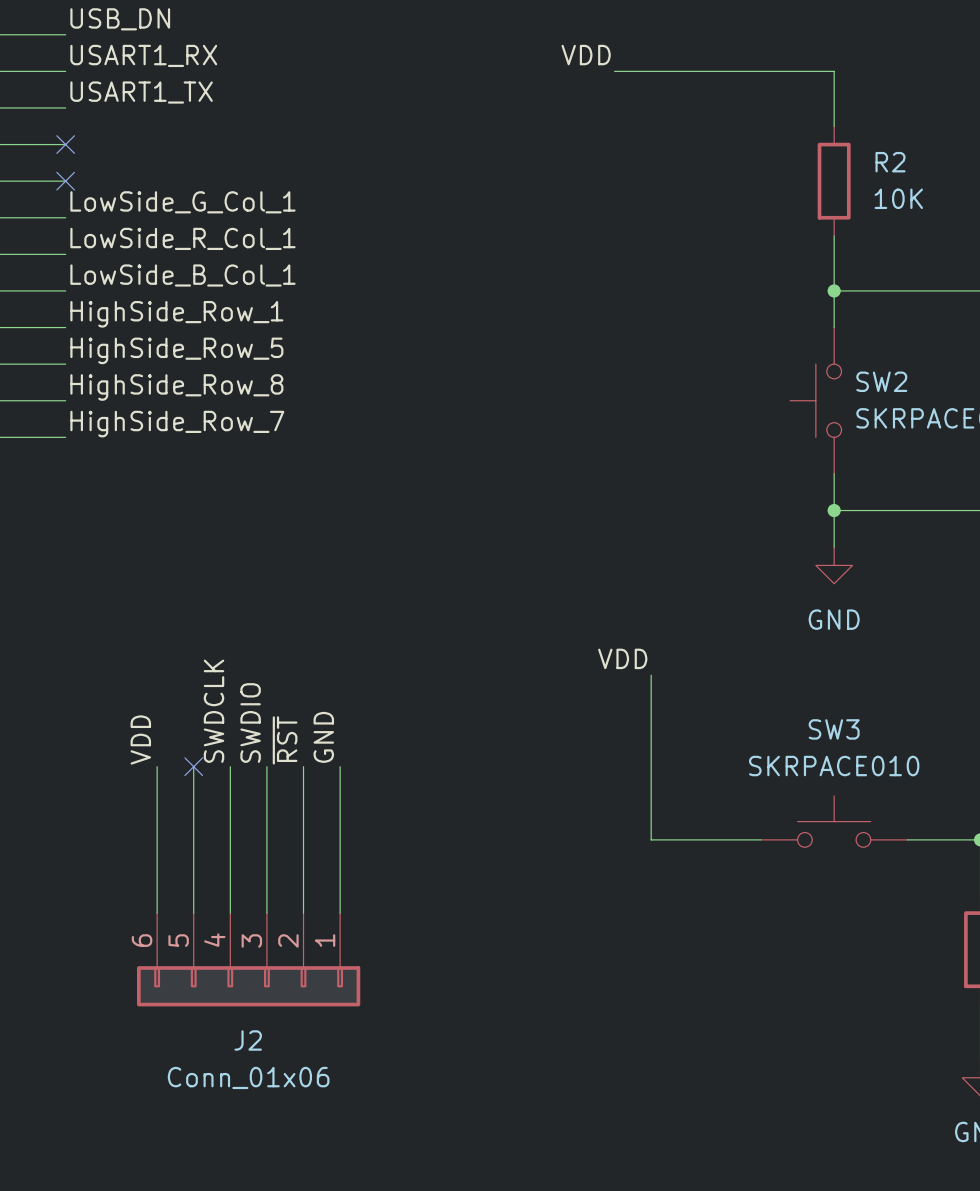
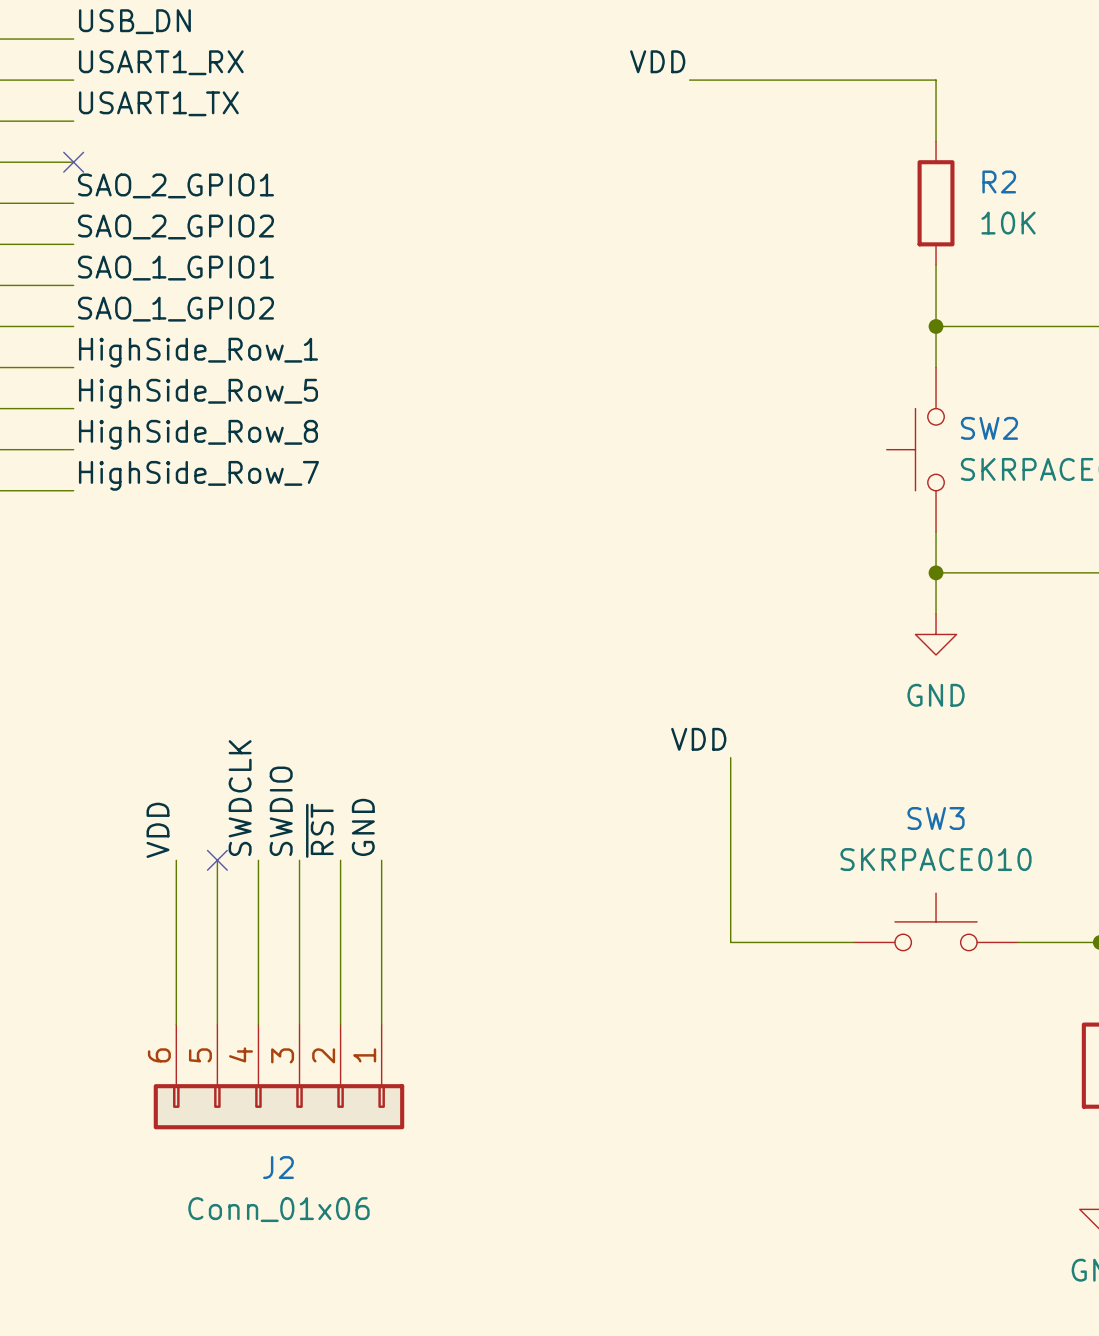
label: none -> SAO_2_GPIO1 (175, 185)
no-connect mark: (65, 181) -> none
label: LowSide_G_Col_1 (182, 202) -> SAO_2_GPIO2 (175, 227)
label: LowSide_R_Col_1 (182, 238) -> SAO_1_GPIO1 (175, 268)
label: LowSide_B_Col_1 (182, 275) -> SAO_1_GPIO2 (175, 309)

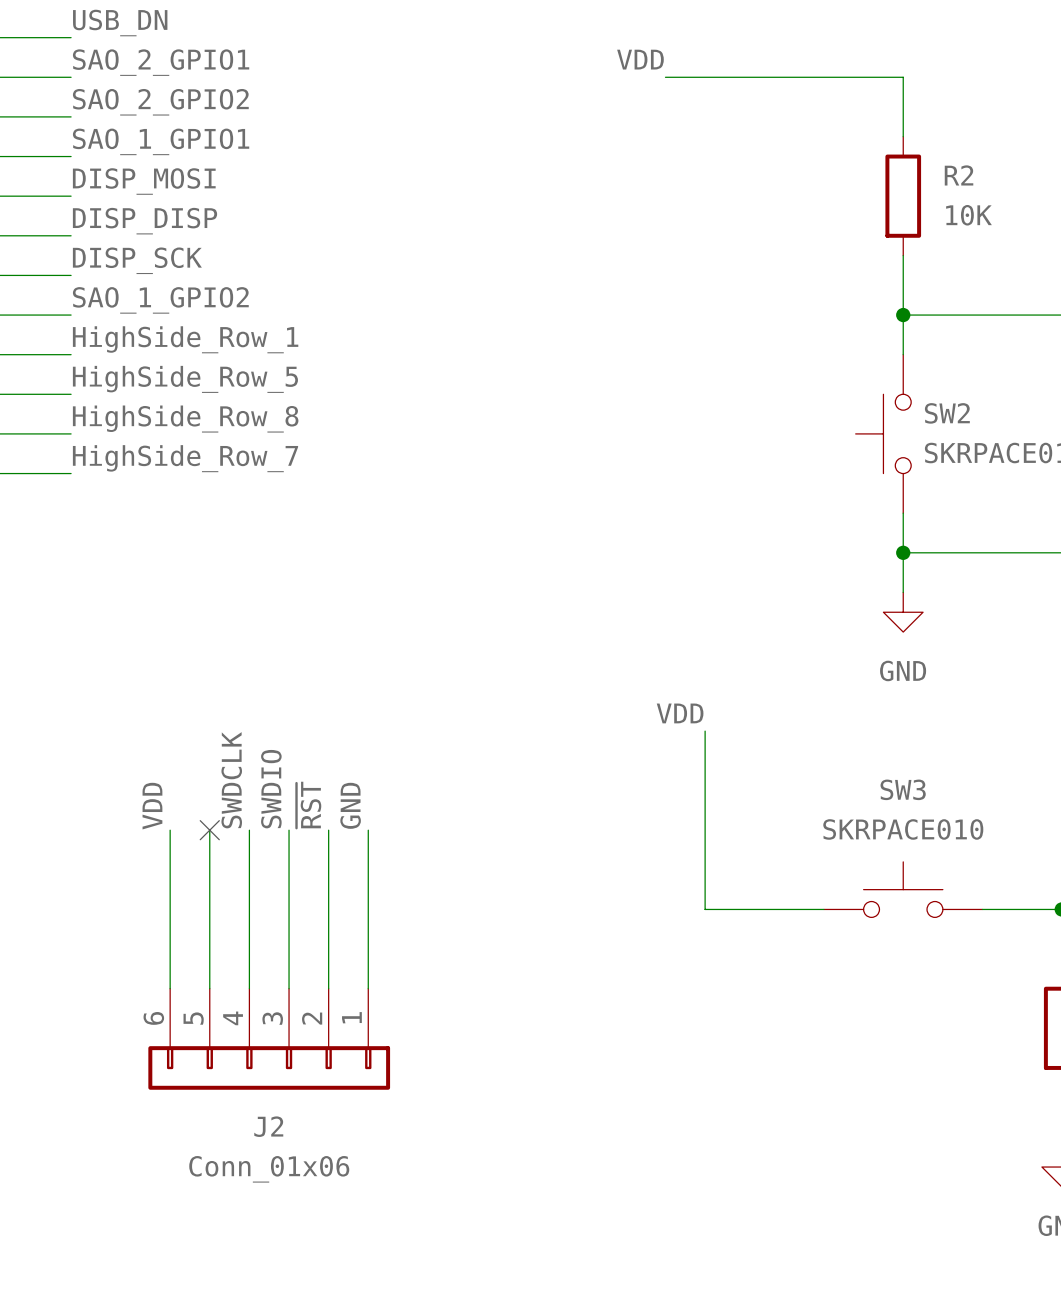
label: USART1_RX (161, 62) -> SAO_2_GPIO1 (161, 62)
label: USART1_TX (158, 103) -> SAO_2_GPIO2 (160, 102)
label: none -> SAO_1_GPIO1 (161, 141)
no-connect mark: (73, 162) -> none
label: SAO_2_GPIO1 (175, 185) -> DISP_MOSI (144, 181)
label: SAO_2_GPIO2 (175, 227) -> DISP_DISP (145, 221)
label: SAO_1_GPIO1 (175, 268) -> DISP_SCK (137, 260)

